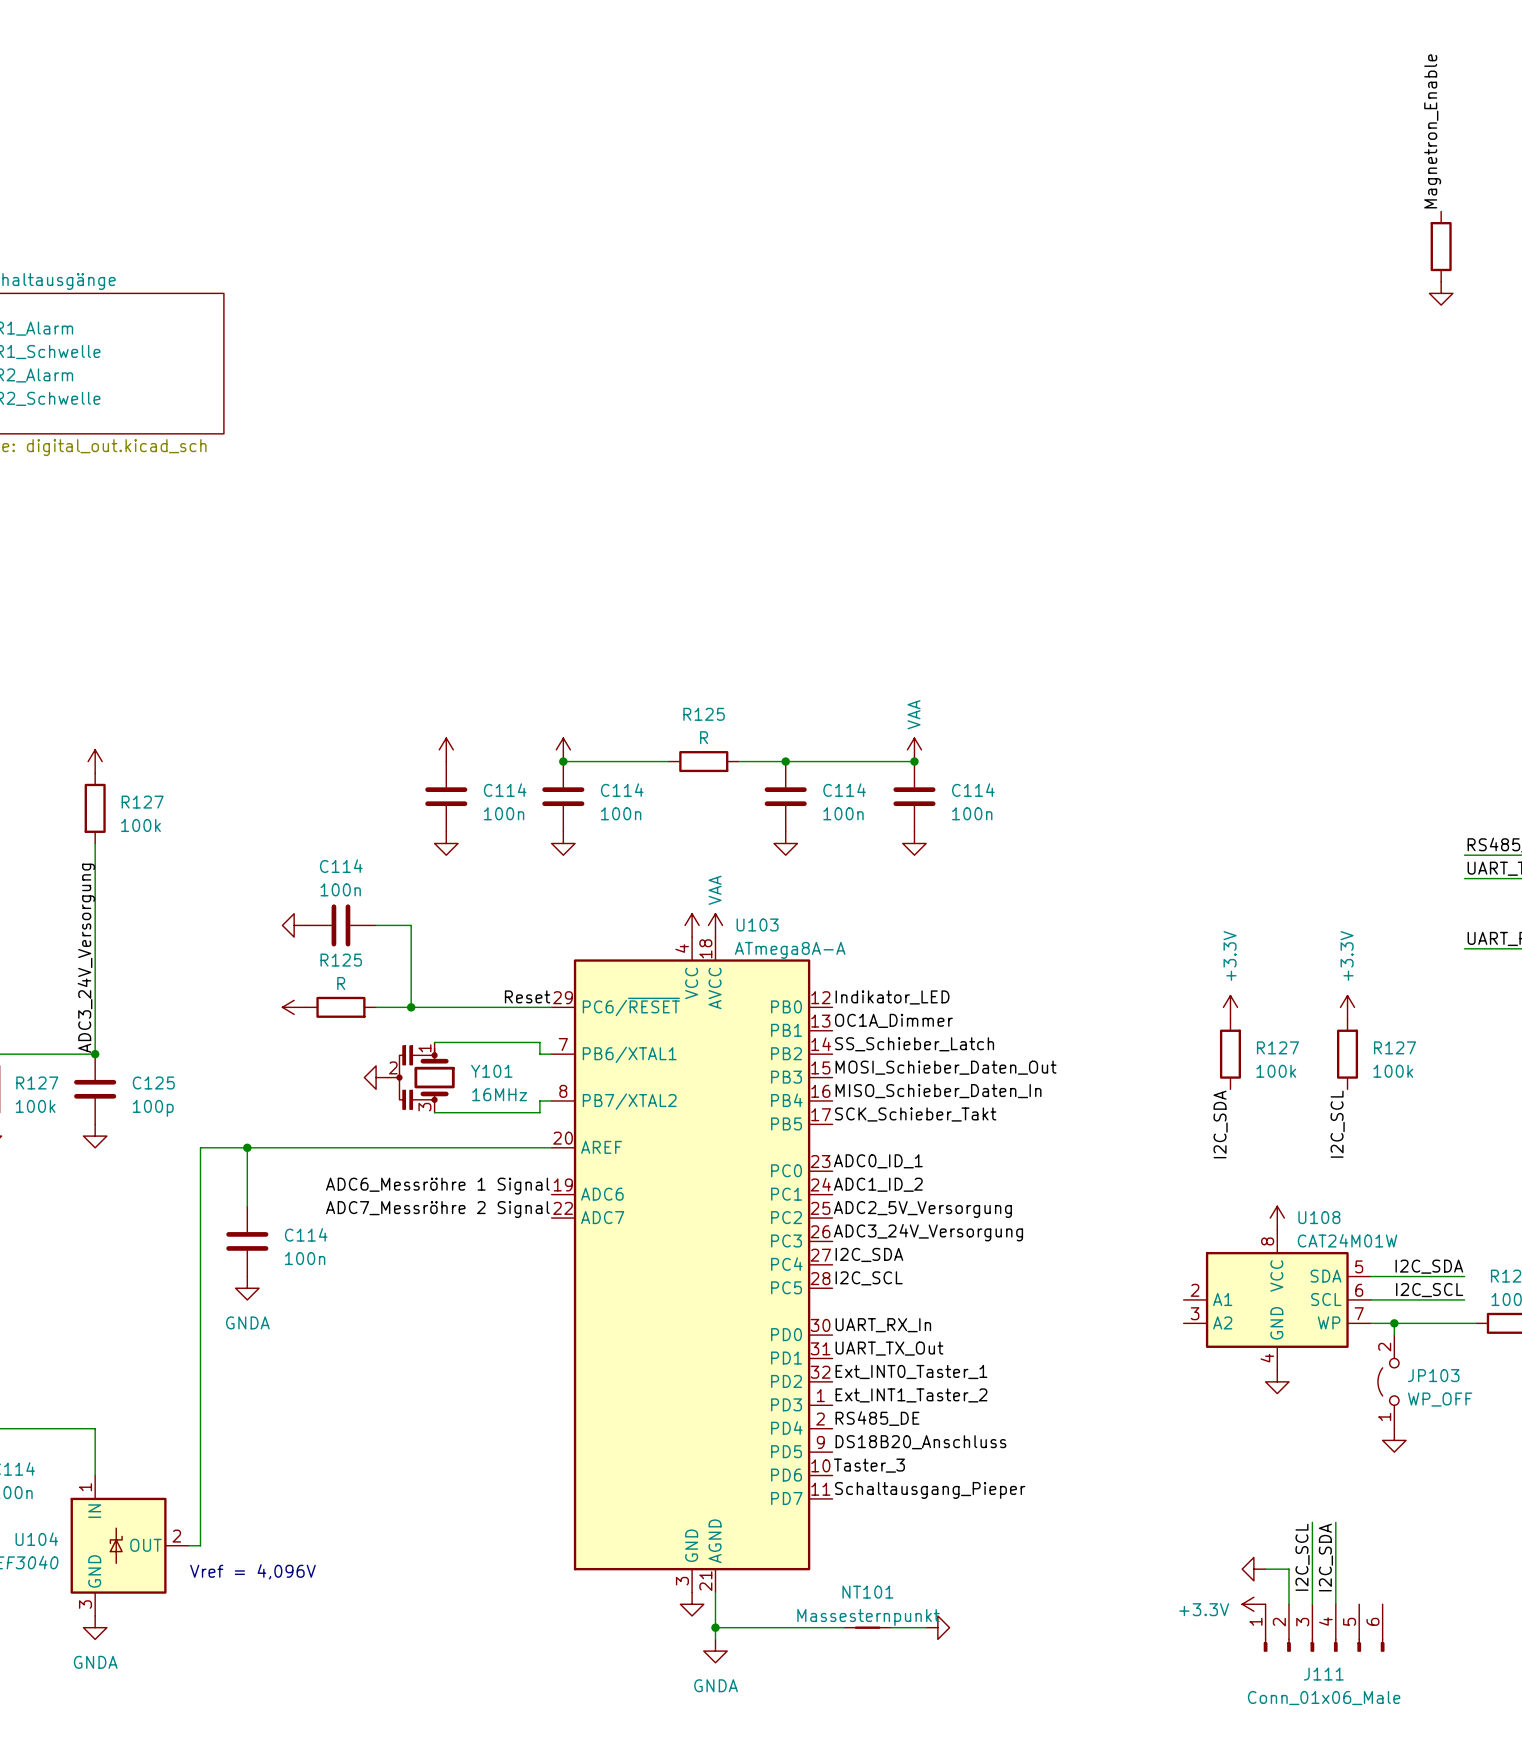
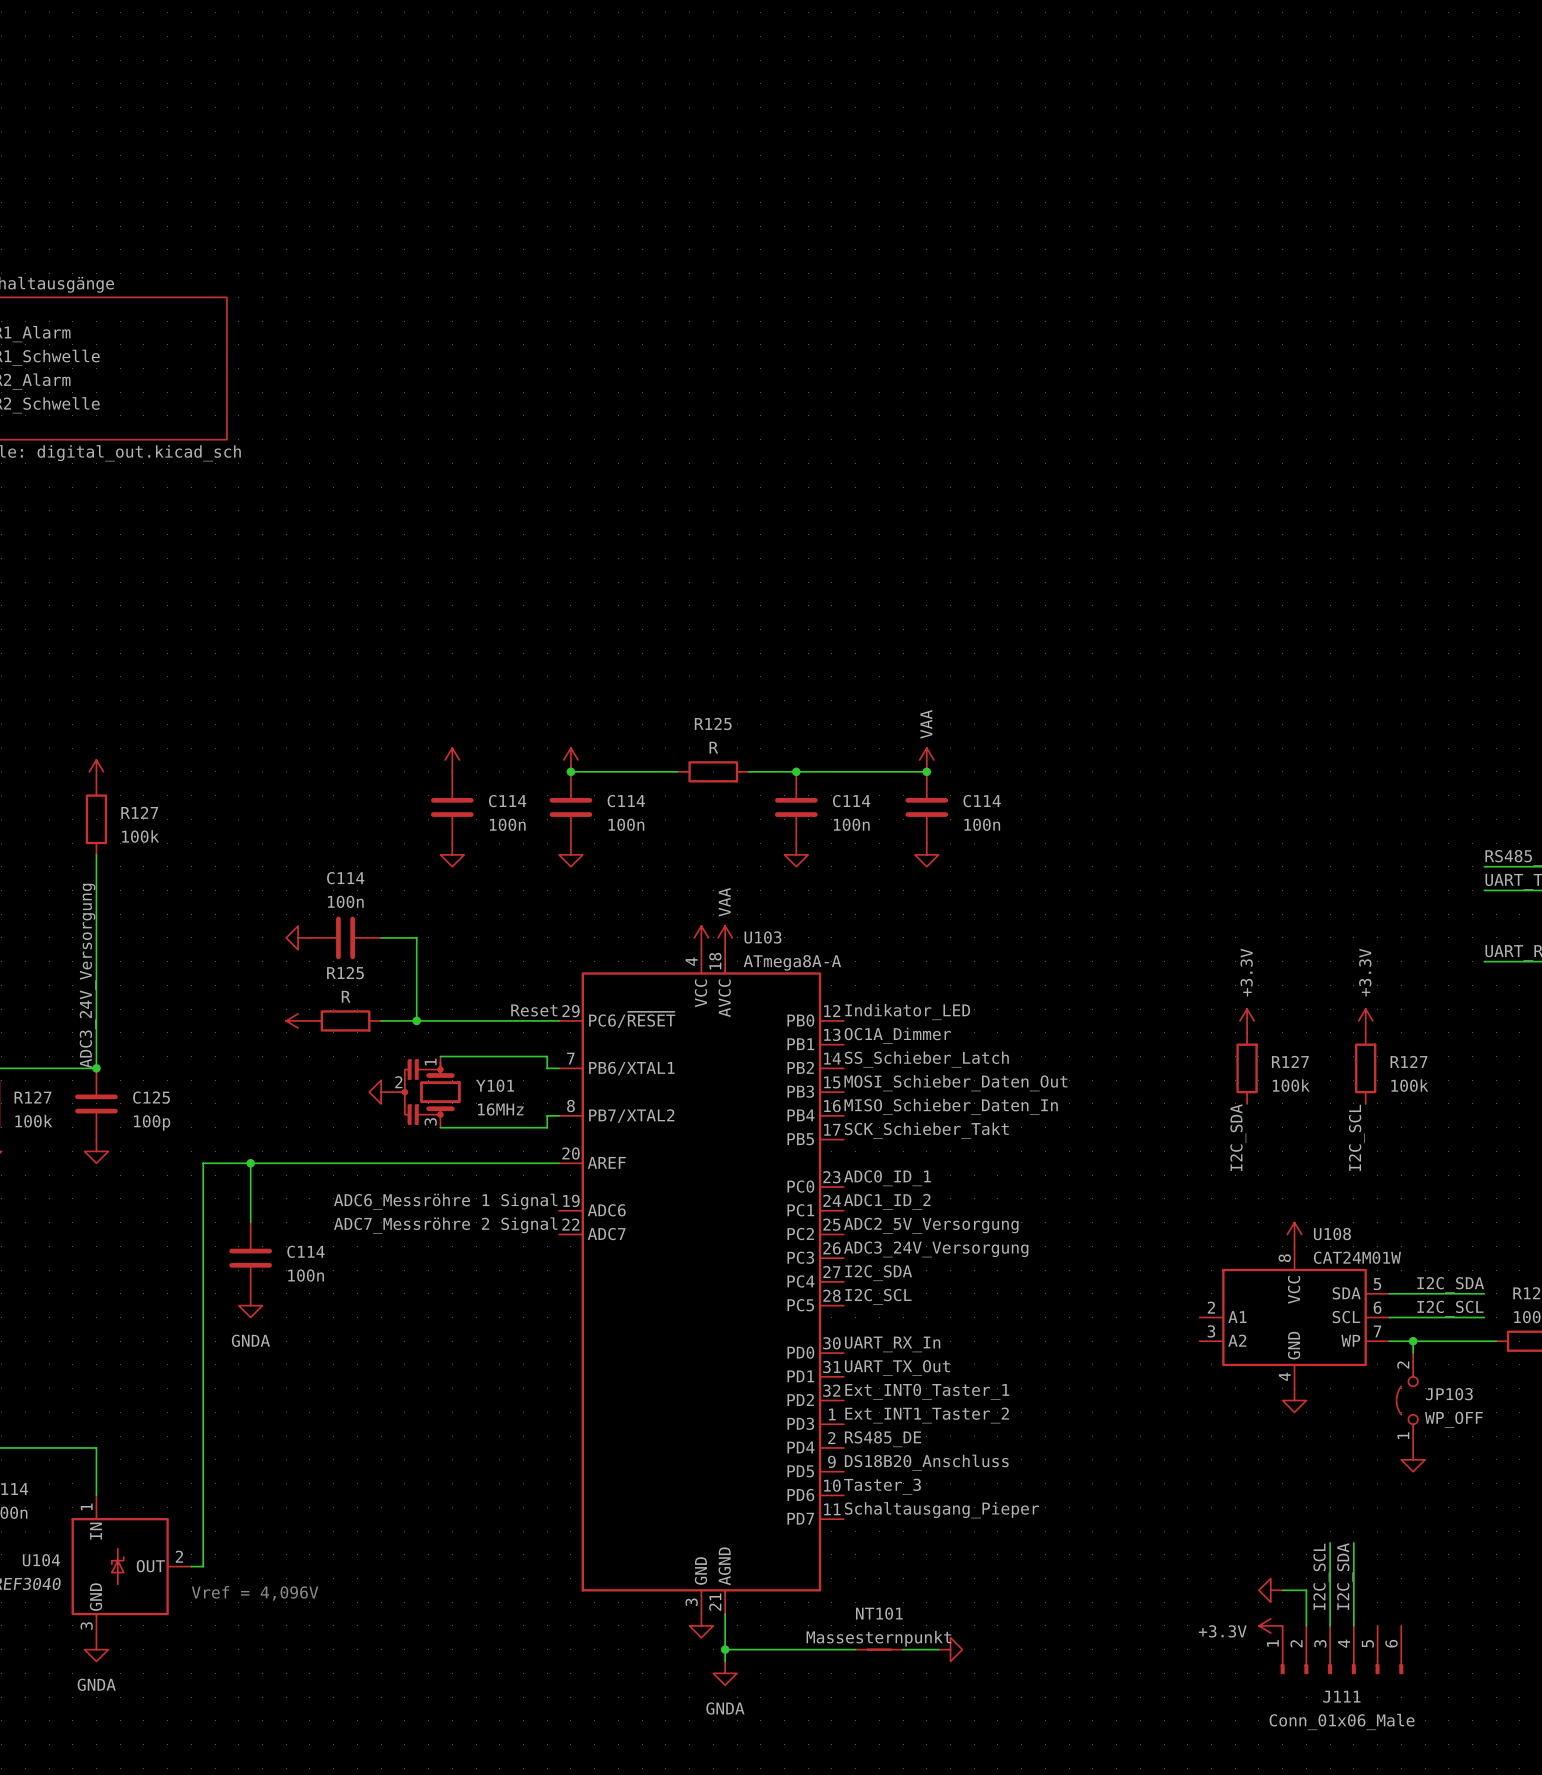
label: Magnetron_Enable (1432, 131) -> none
part: (1441, 246) -> none
power symbol: (1441, 293) -> none

